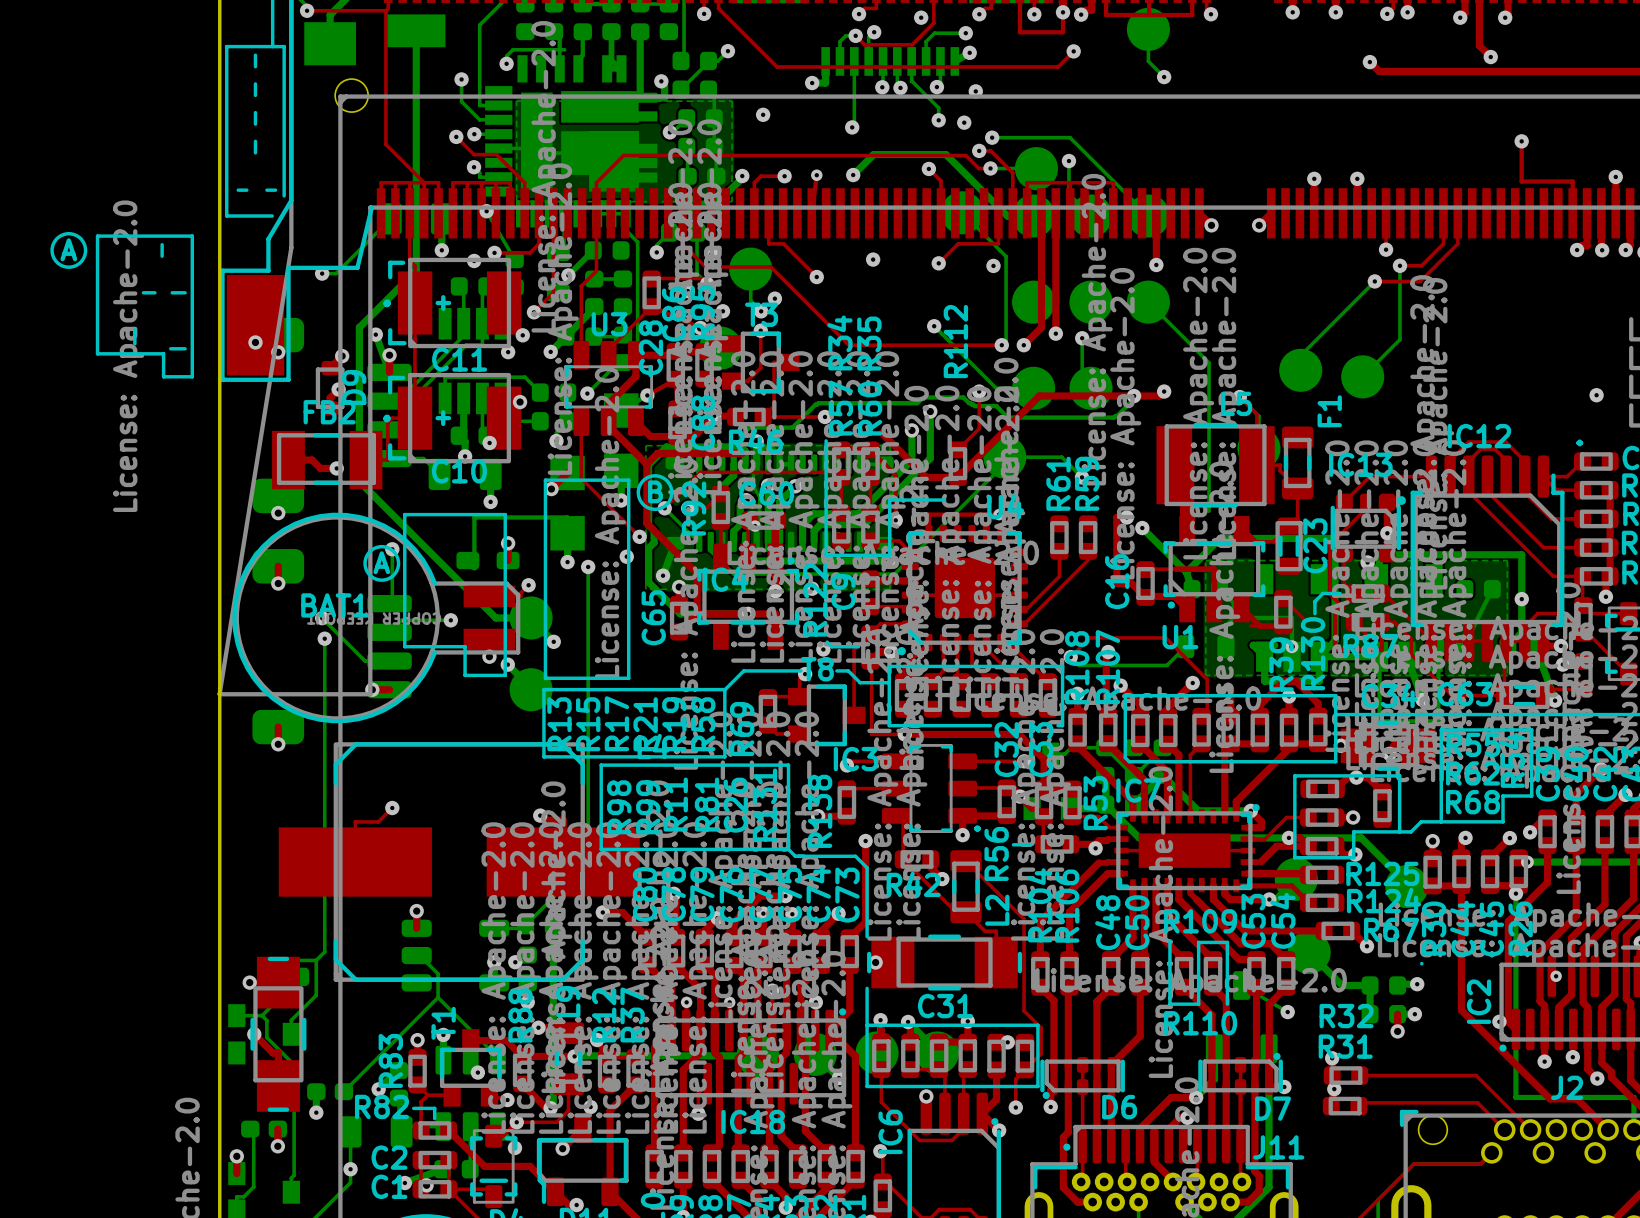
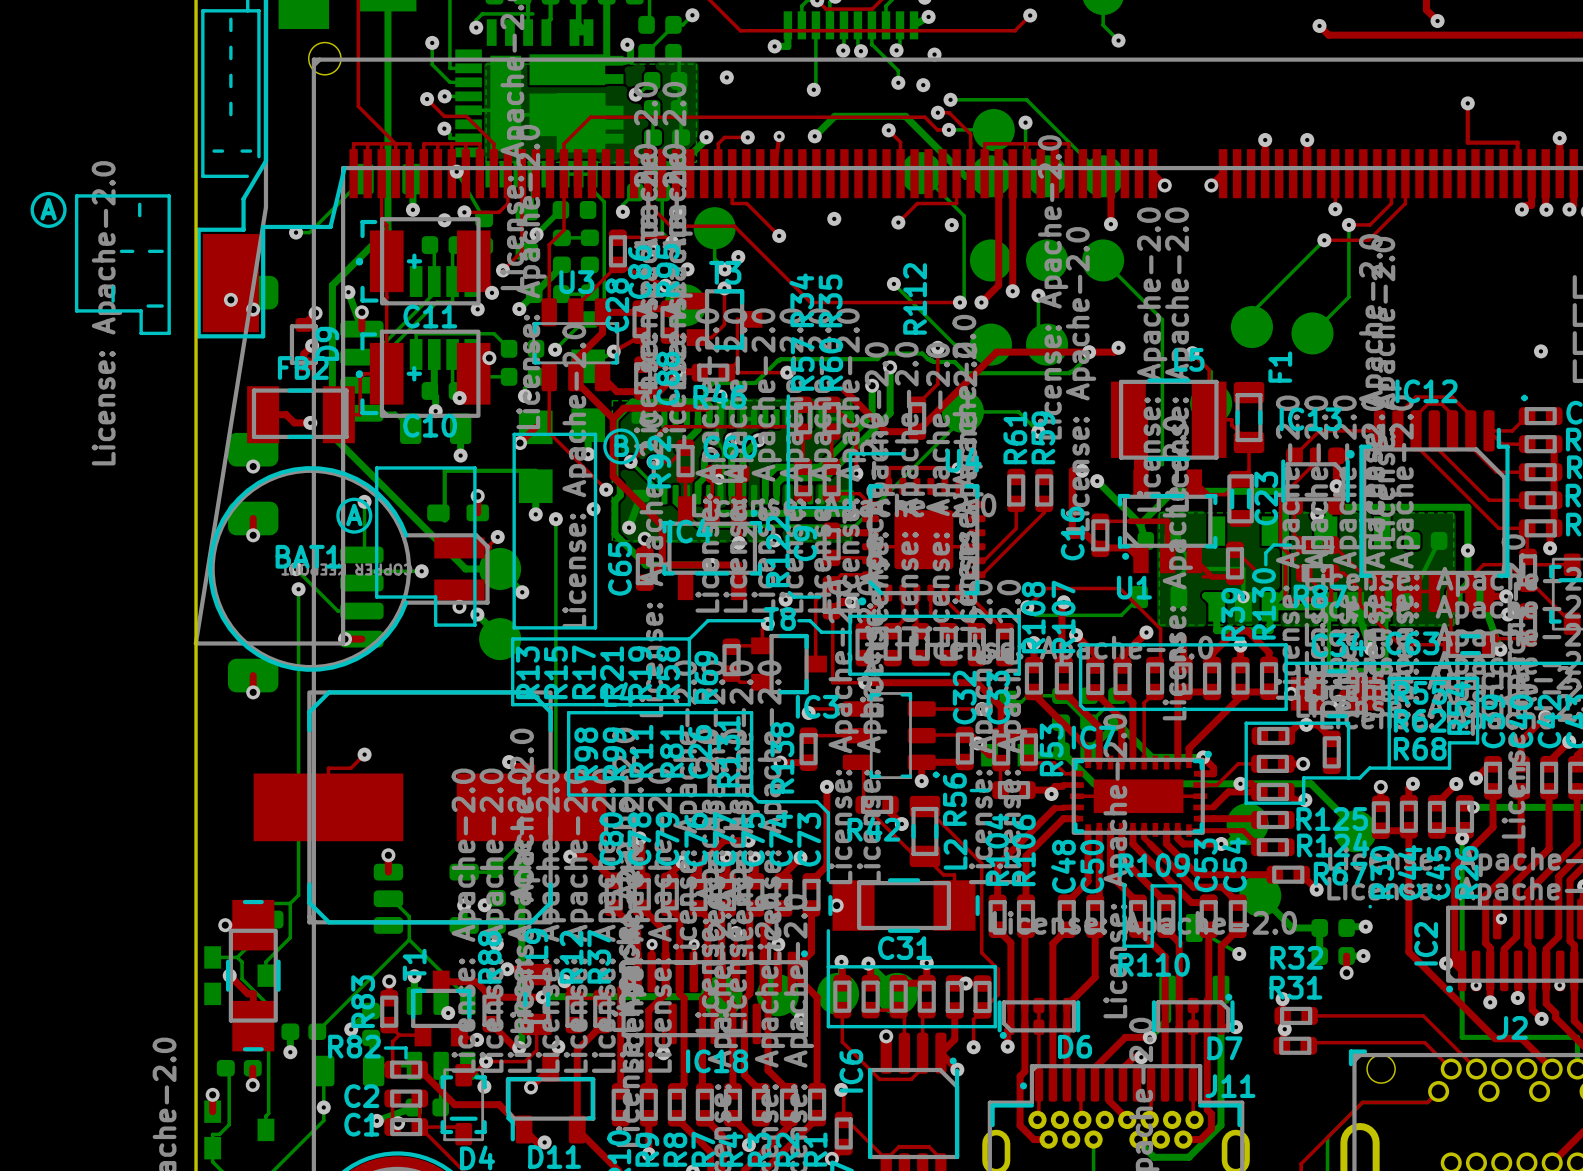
via: none -> (1476, 985)
via: none -> (1559, 985)

